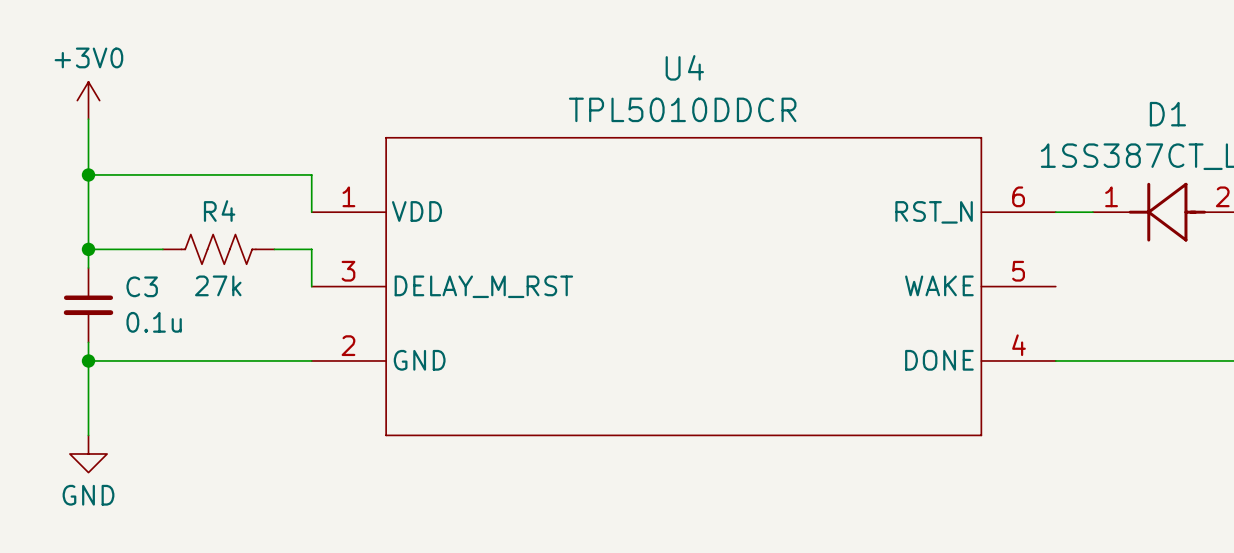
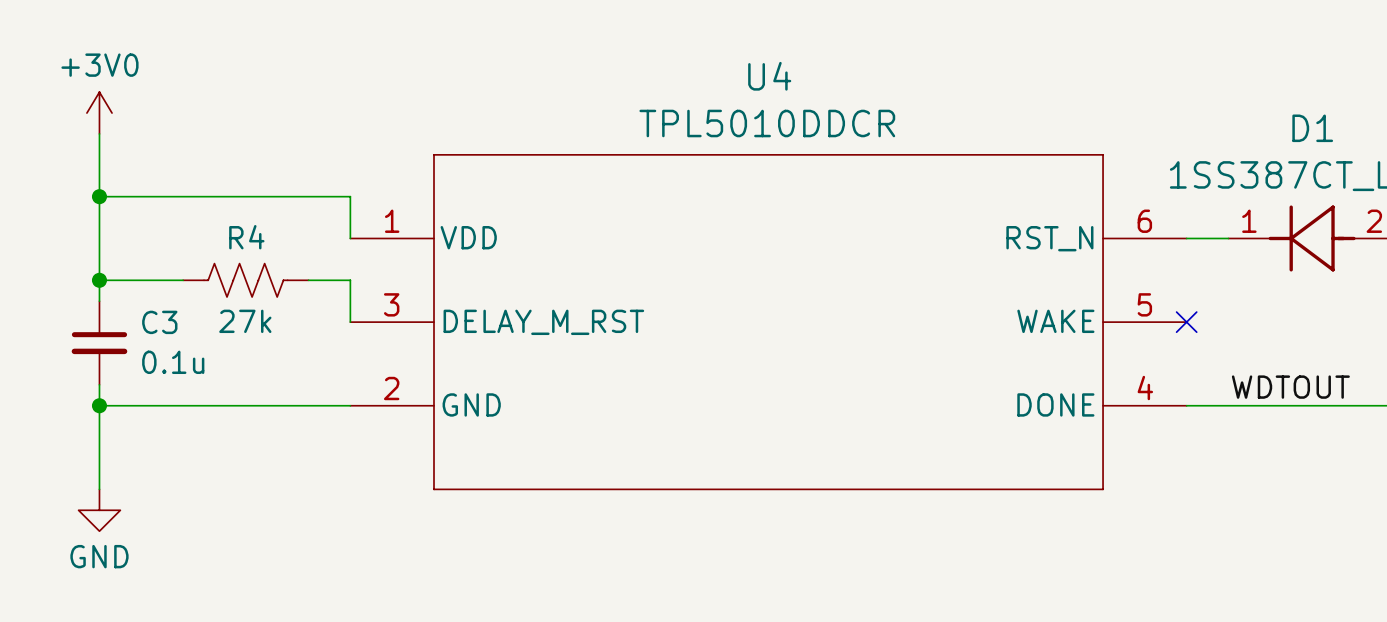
no-connect mark: none -> (1186, 322)
label: none -> WDTOUT (1290, 387)

